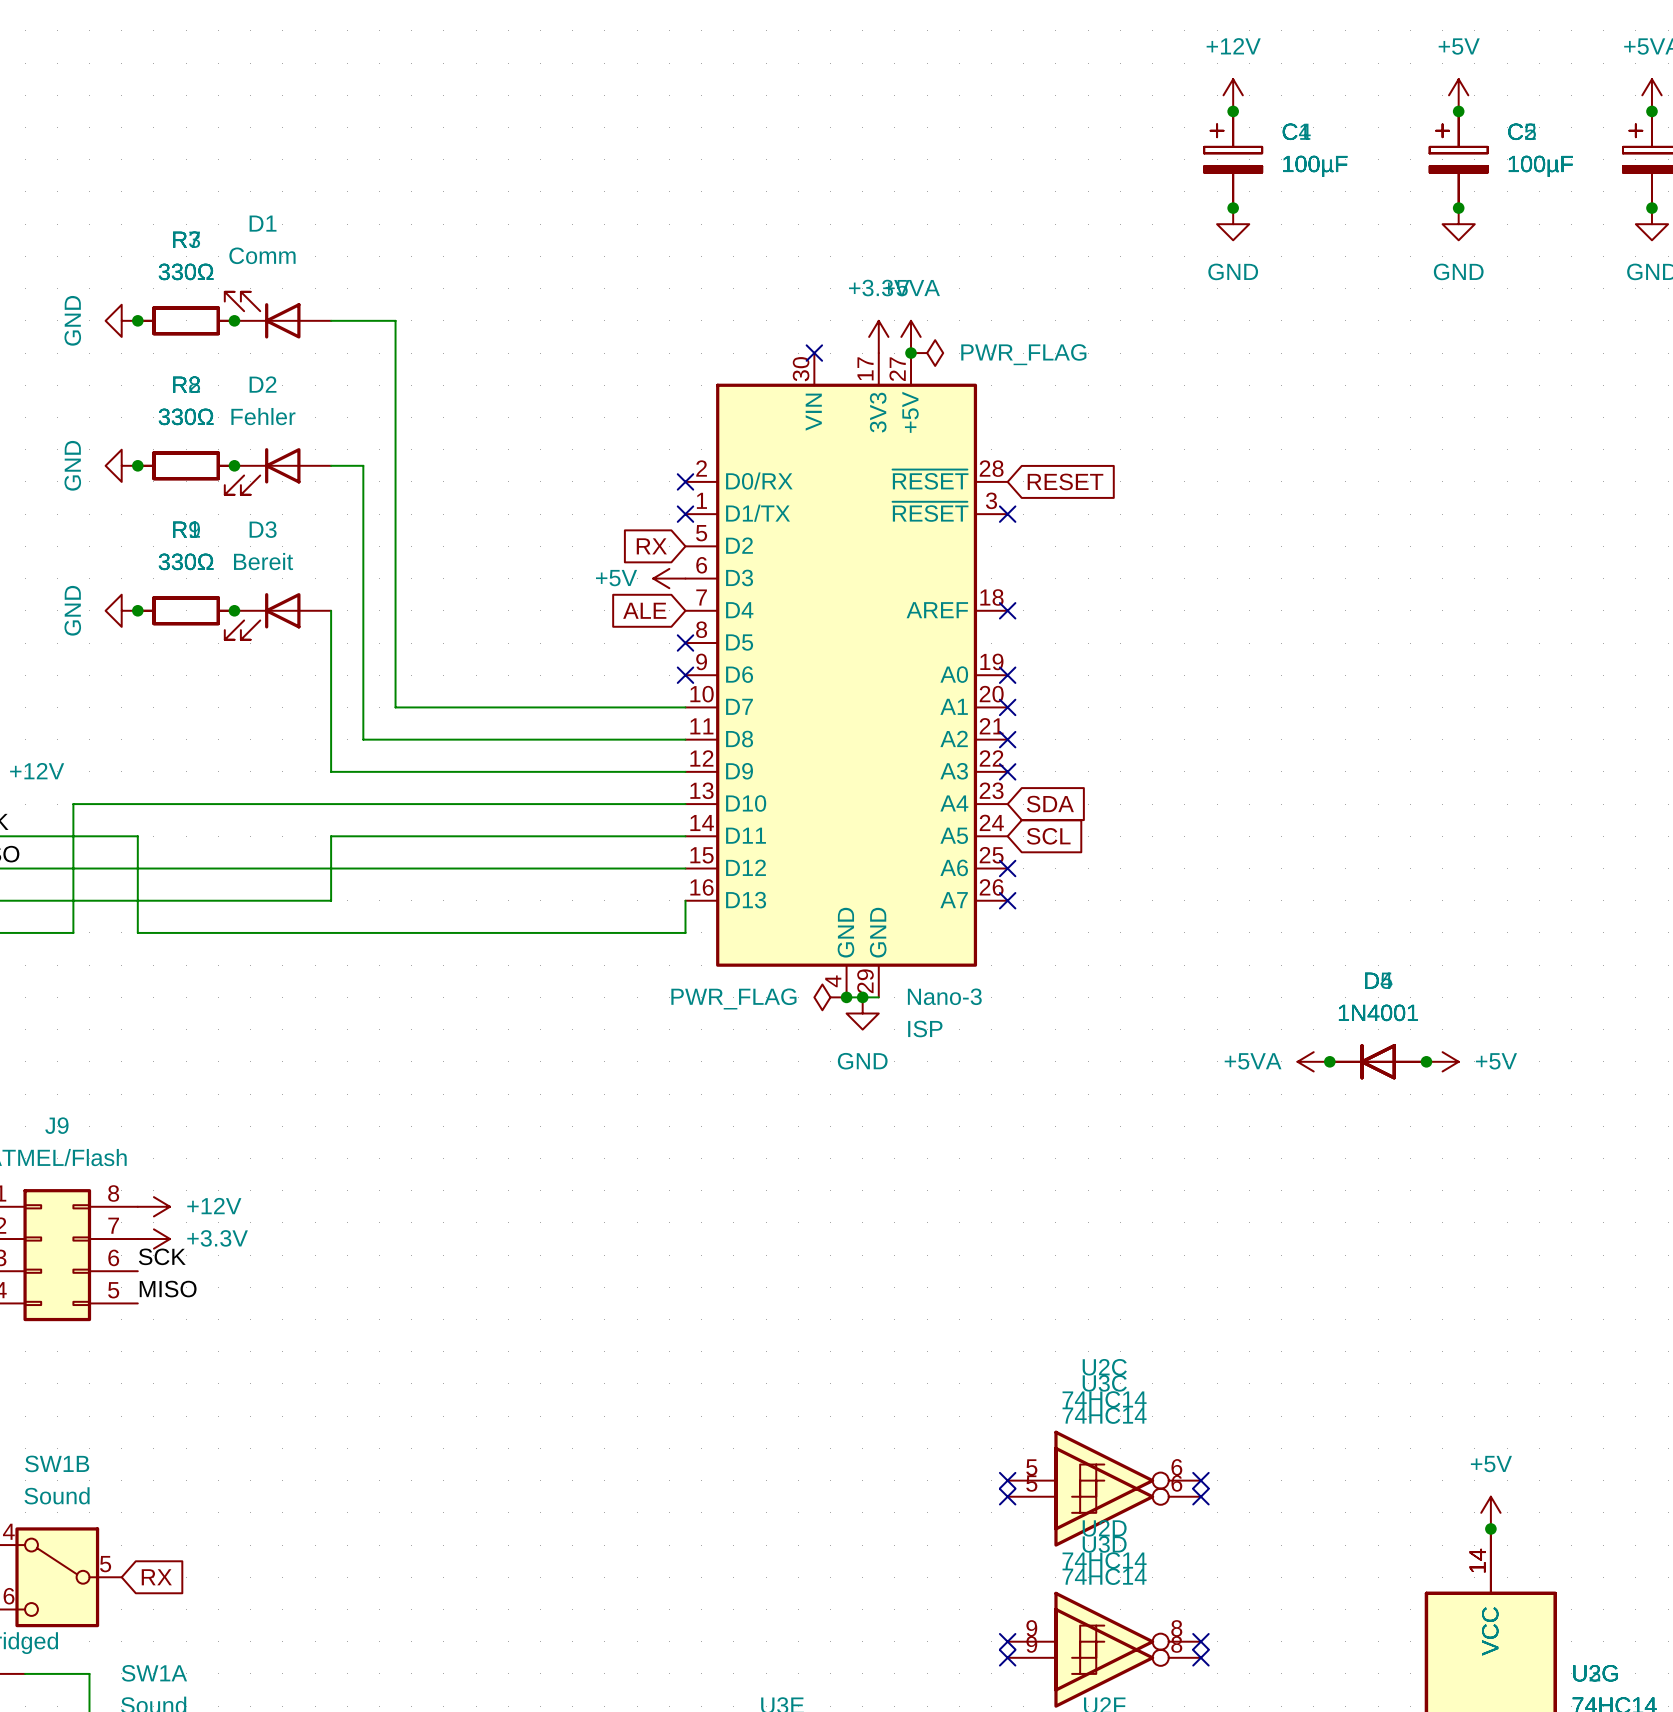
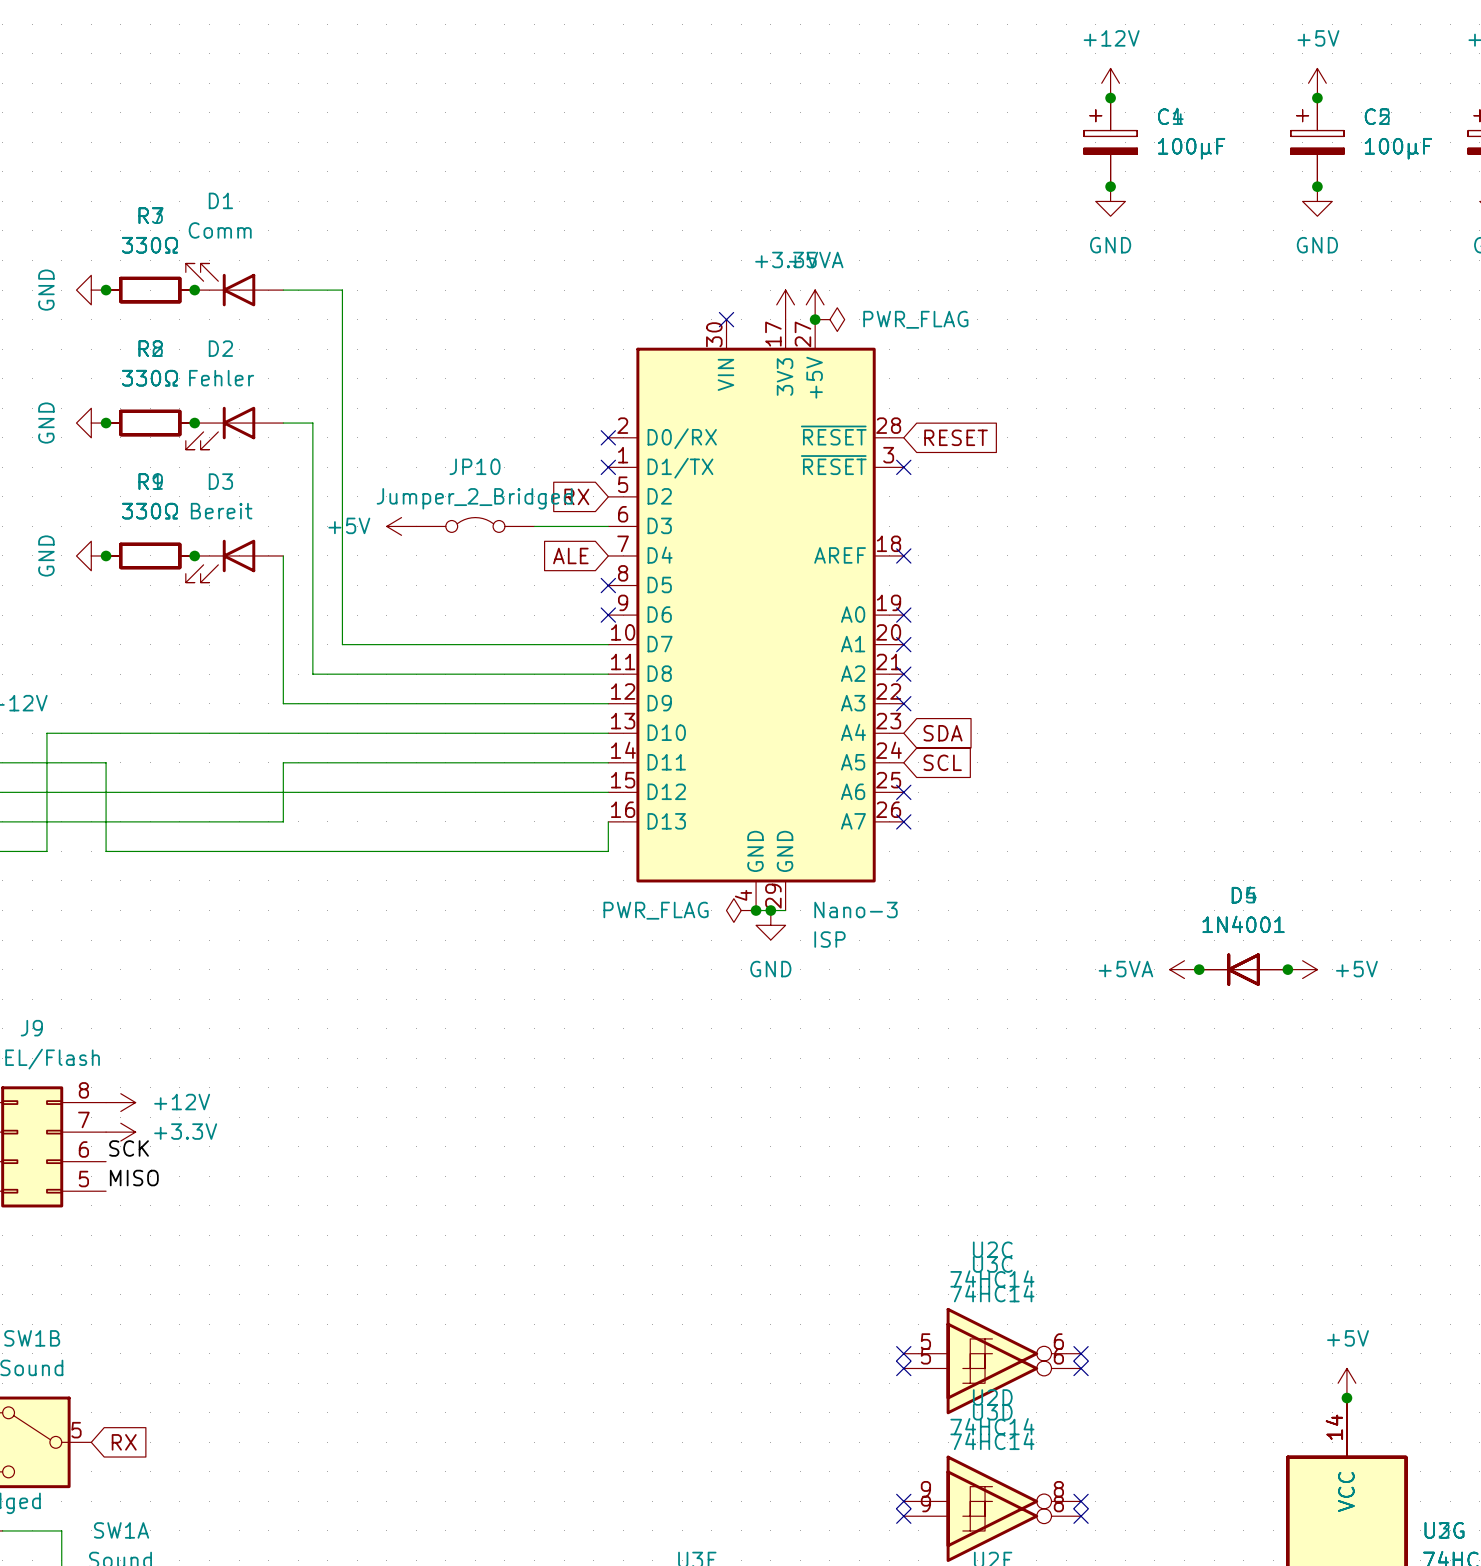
JP10: none -> Jumper_2_Bridged (475, 524)
wire: none -> (534, 526) (608, 526)
power symbol position: +5V (669, 578) -> +5V (401, 526)

